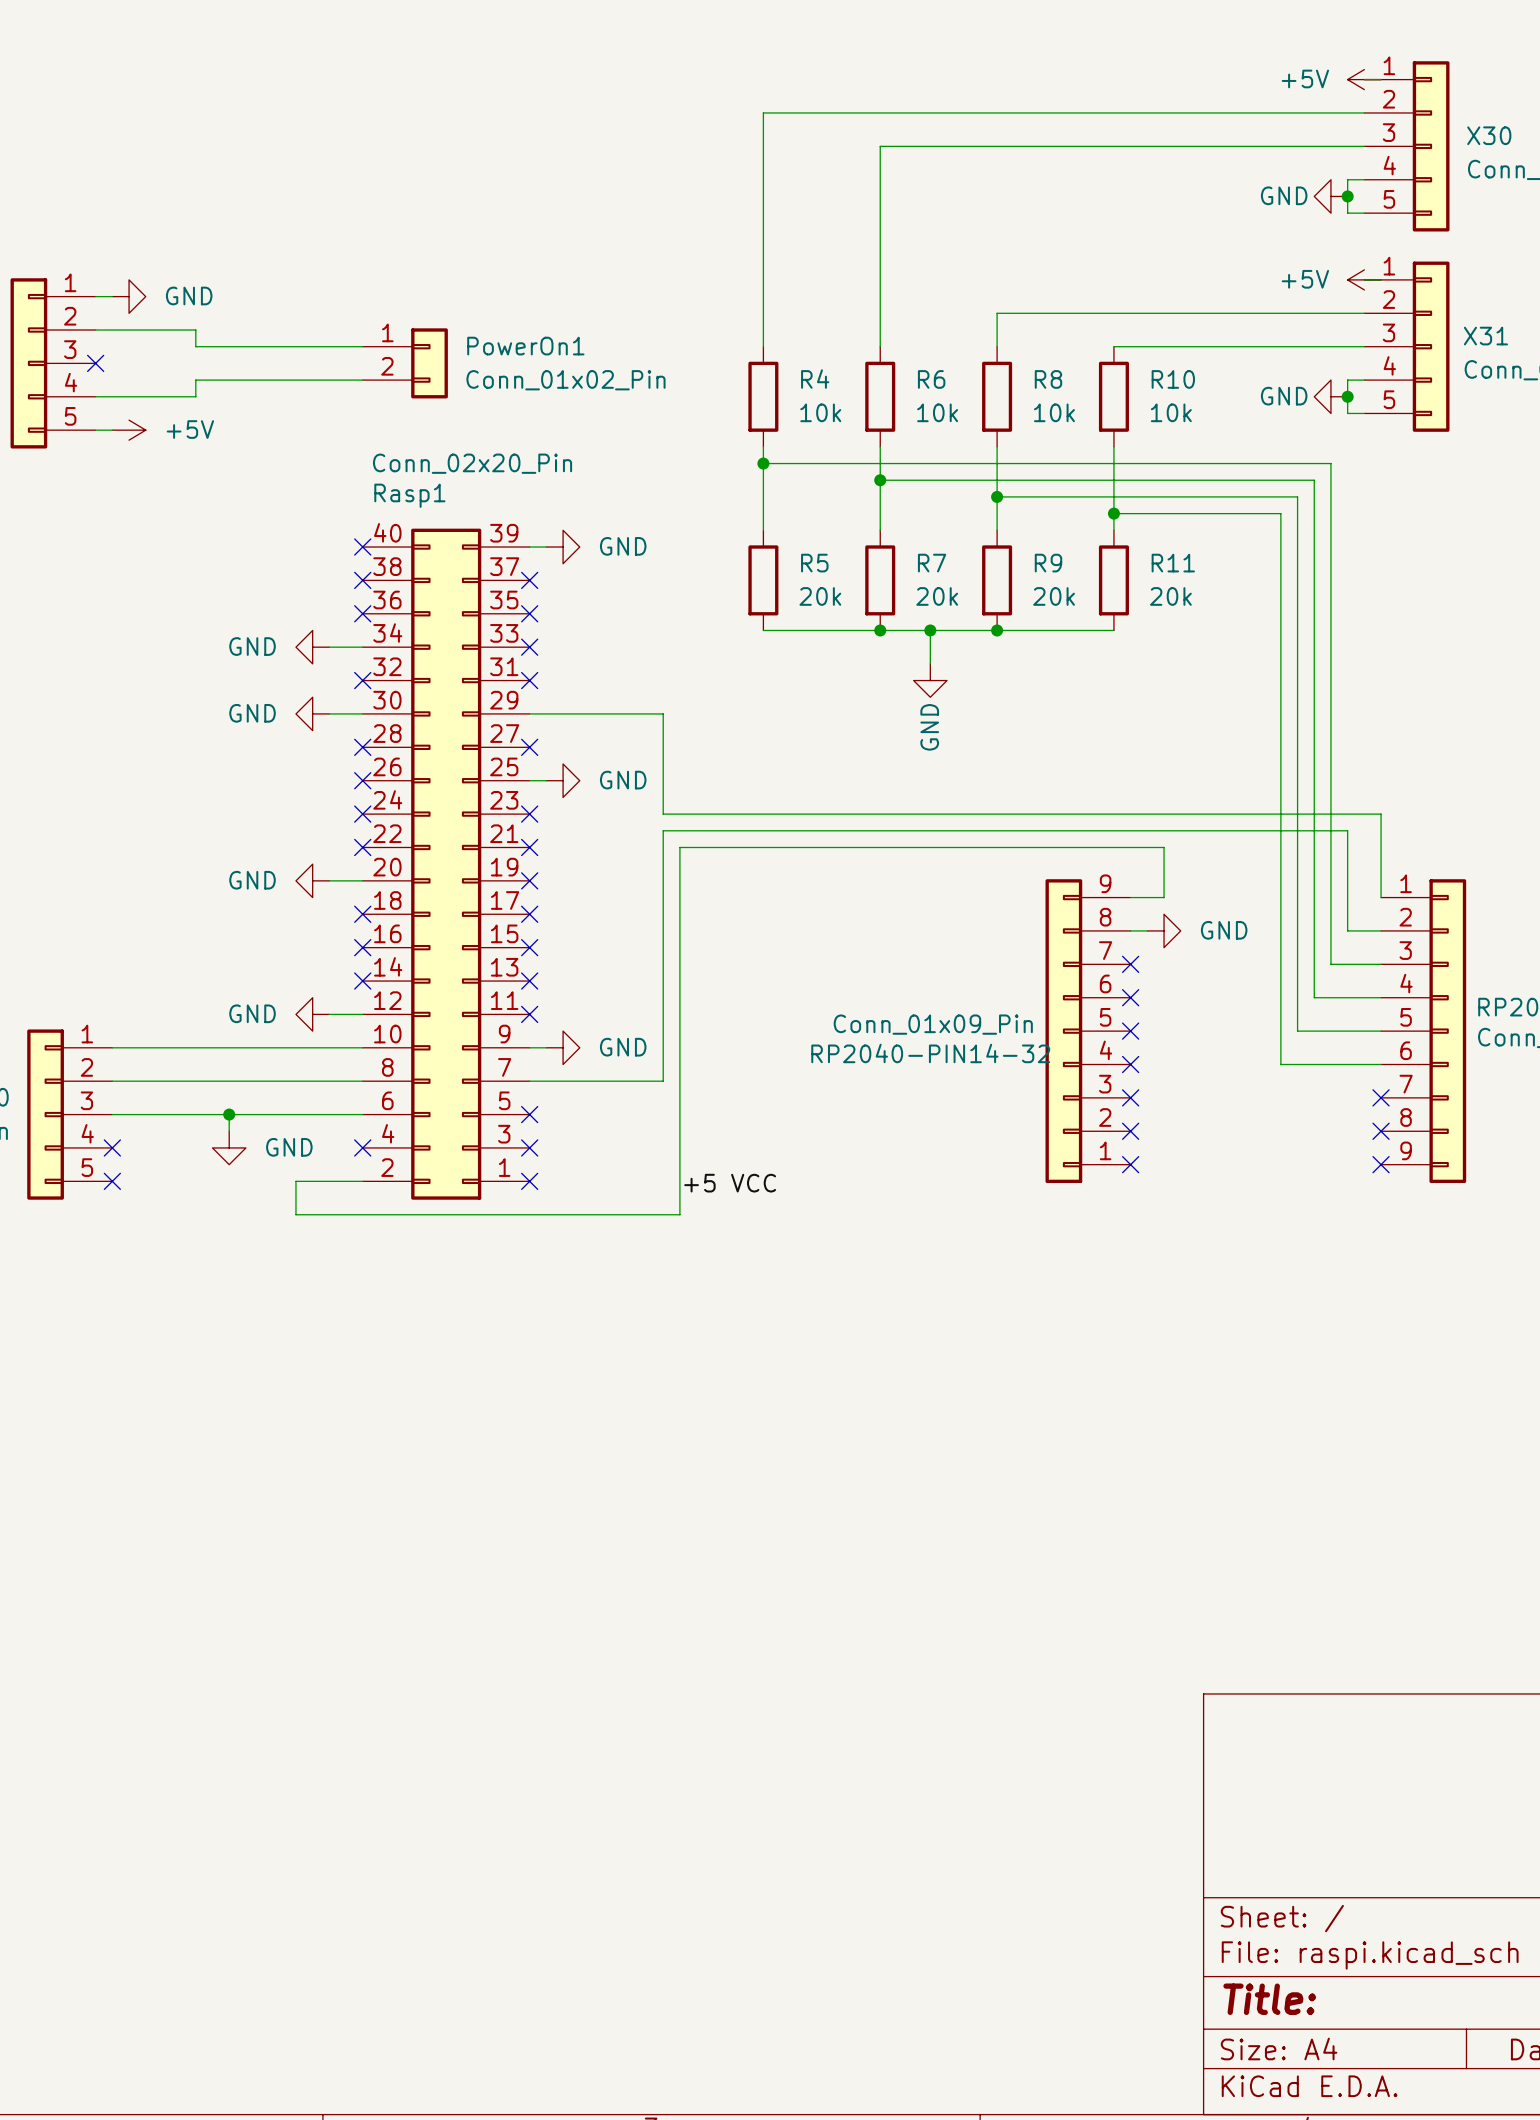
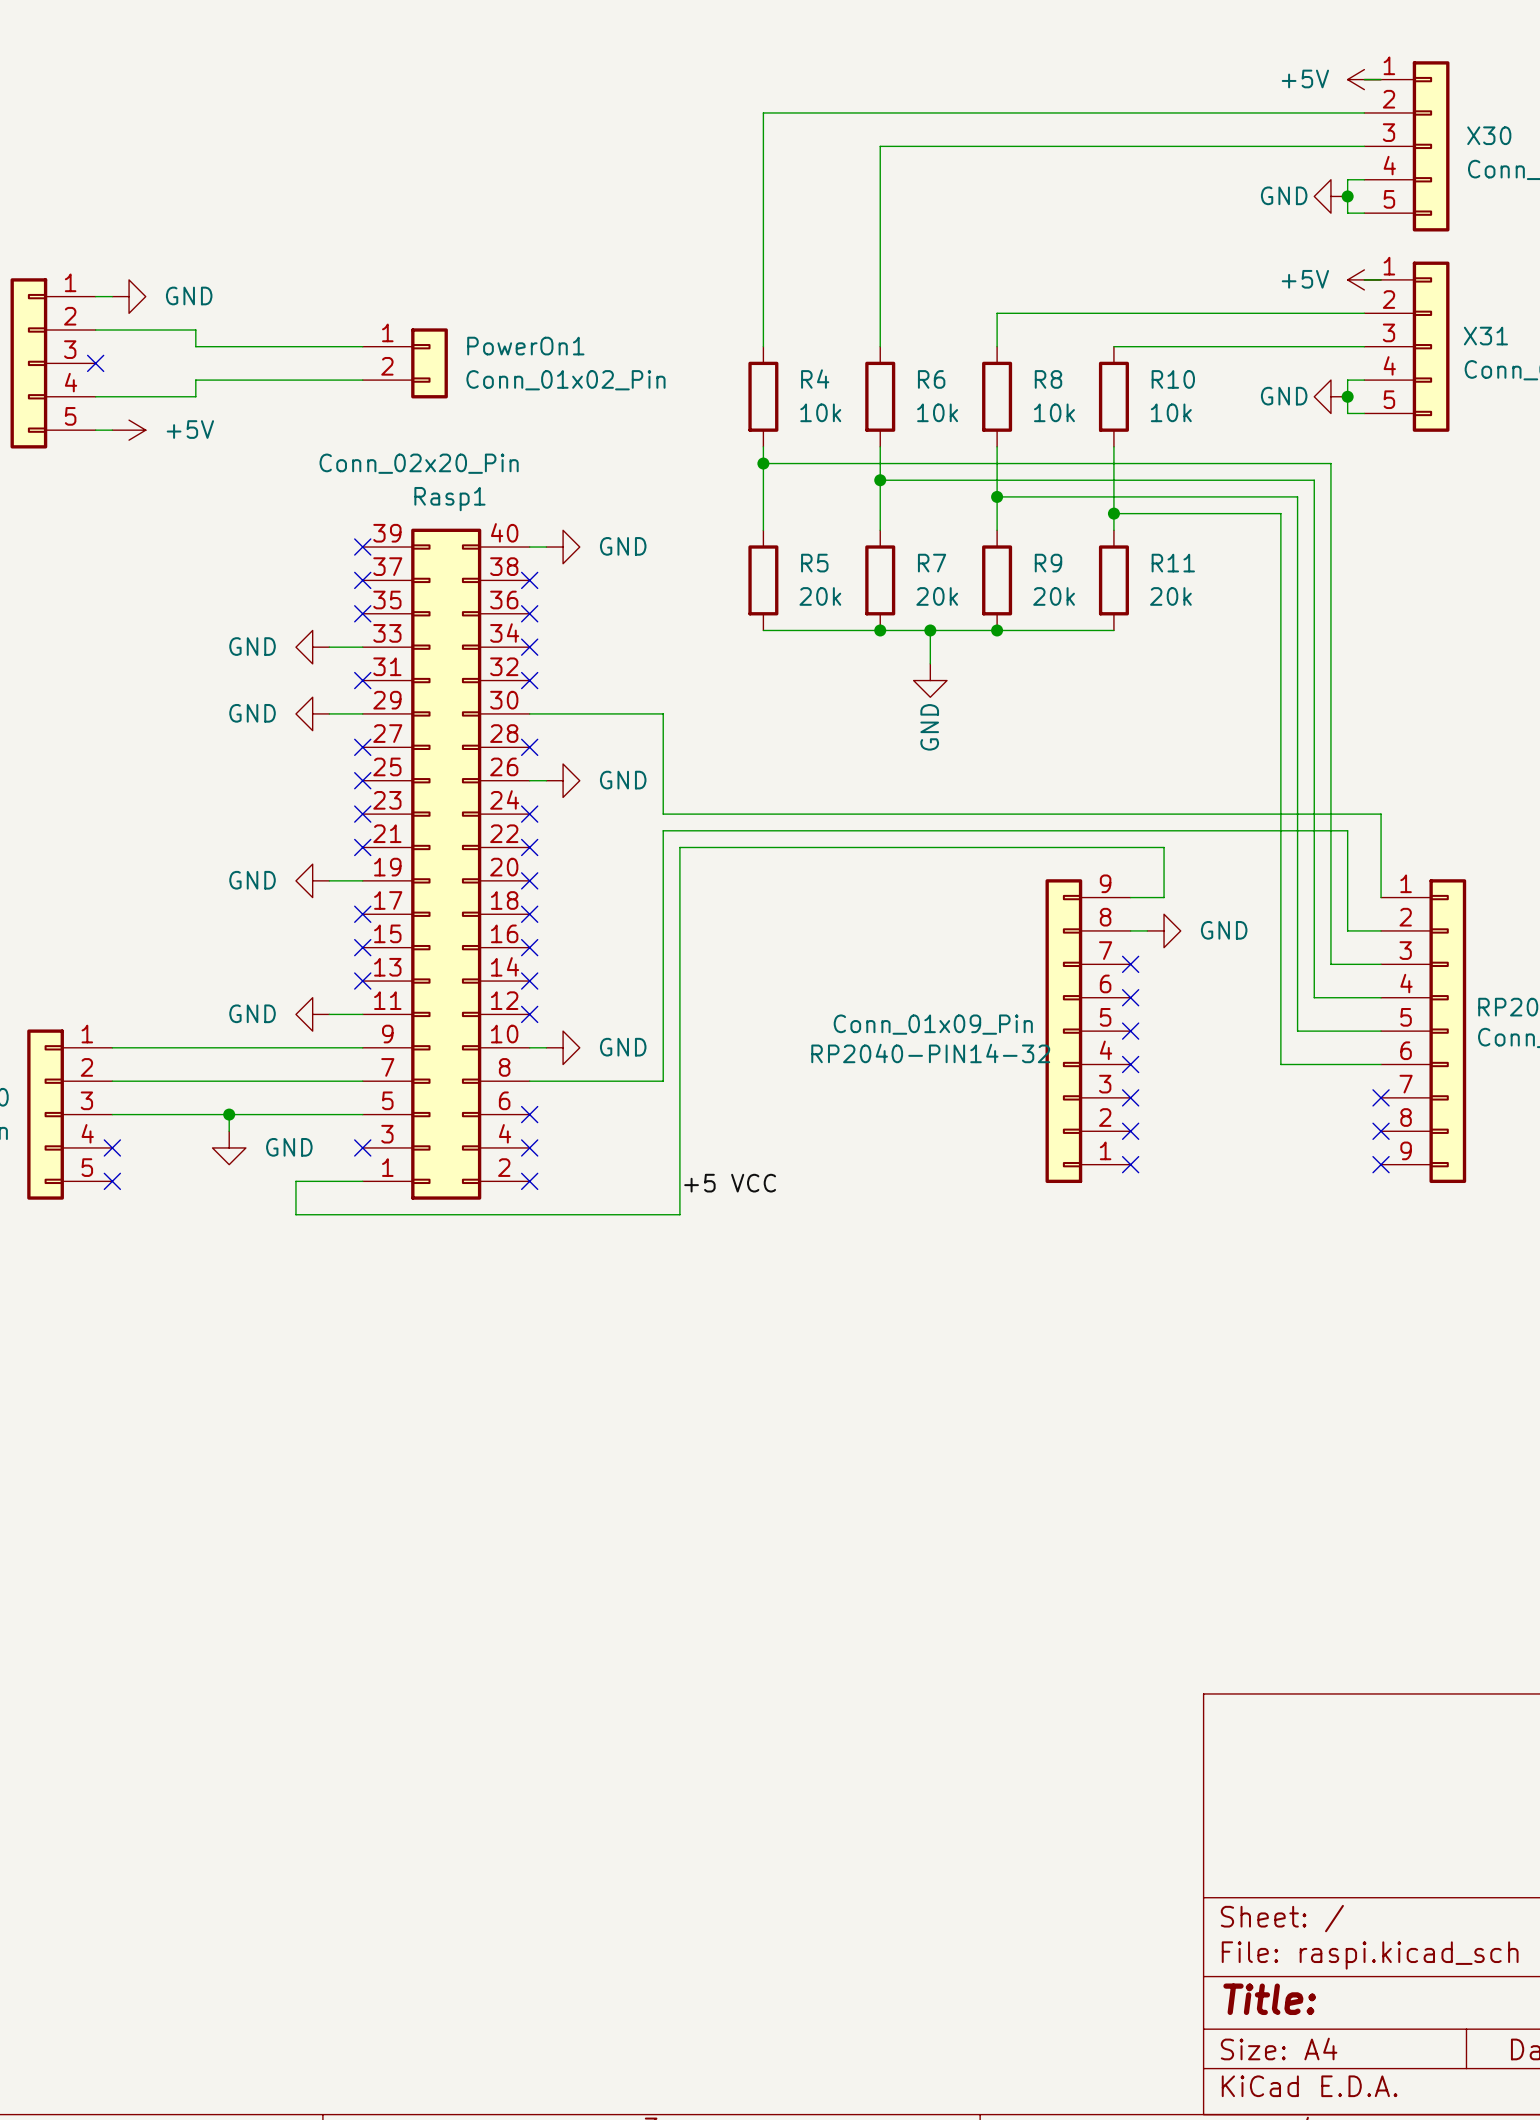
Rasp1 name position: Rasp1 (409, 495) -> Rasp1 (449, 499)
Rasp1 flip: as is (446, 864) -> left-right (446, 864)

